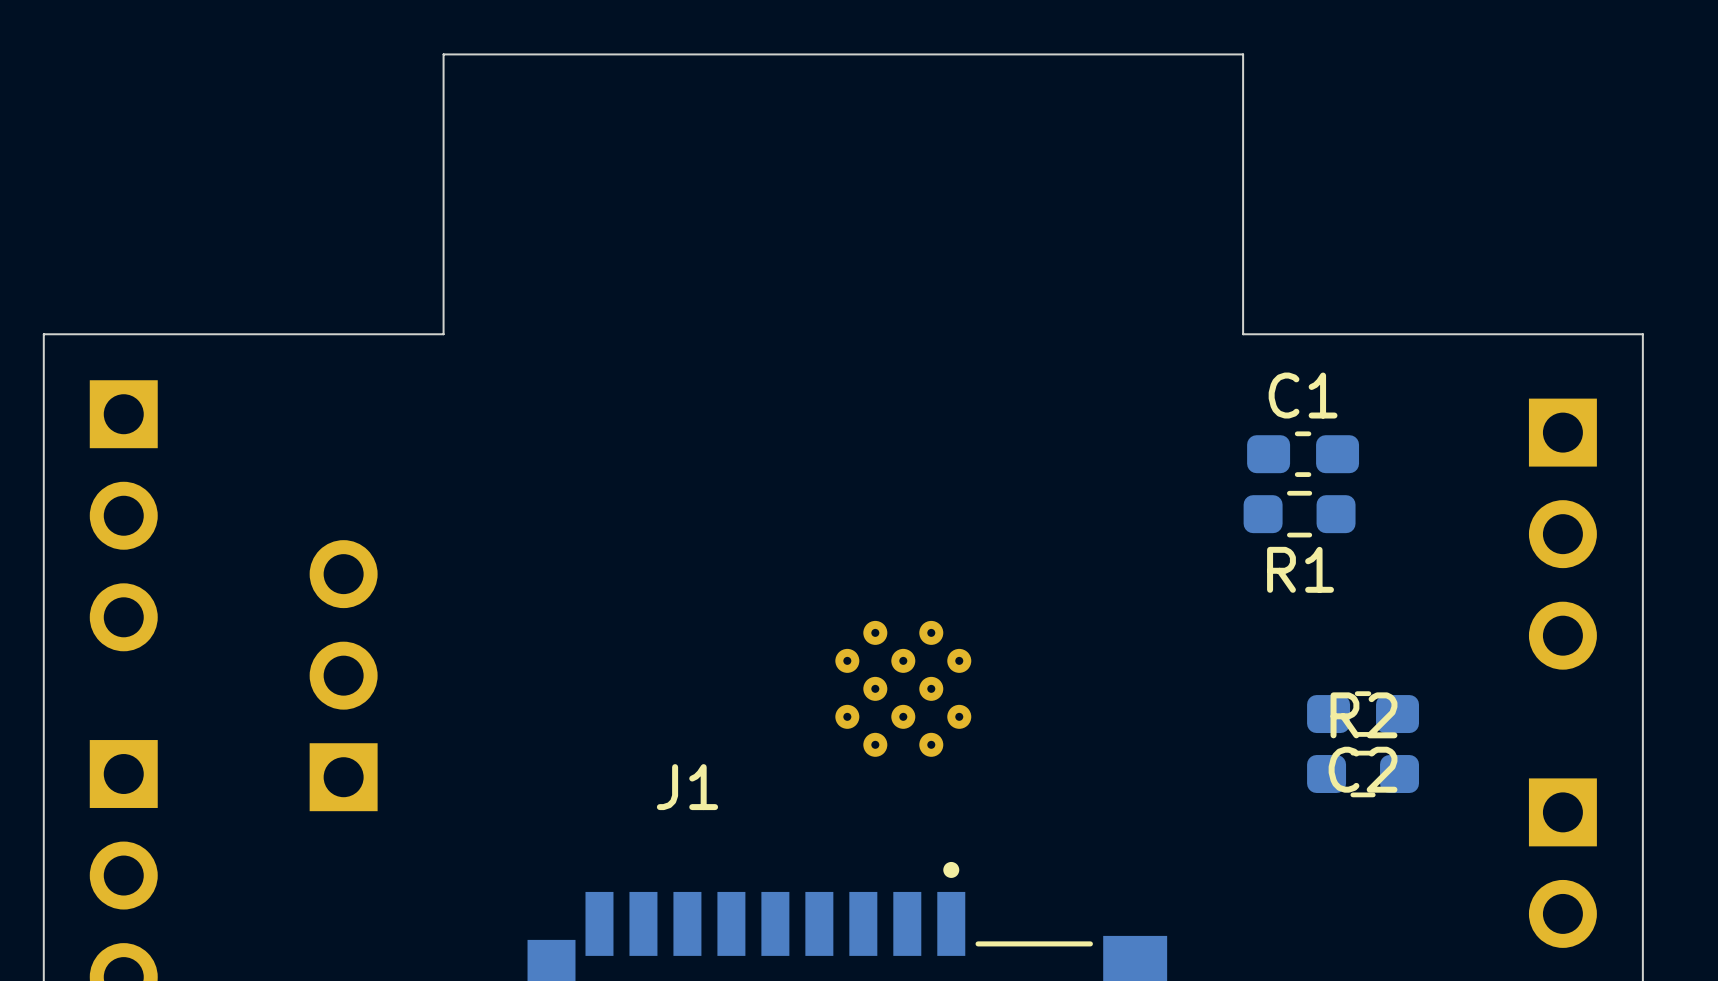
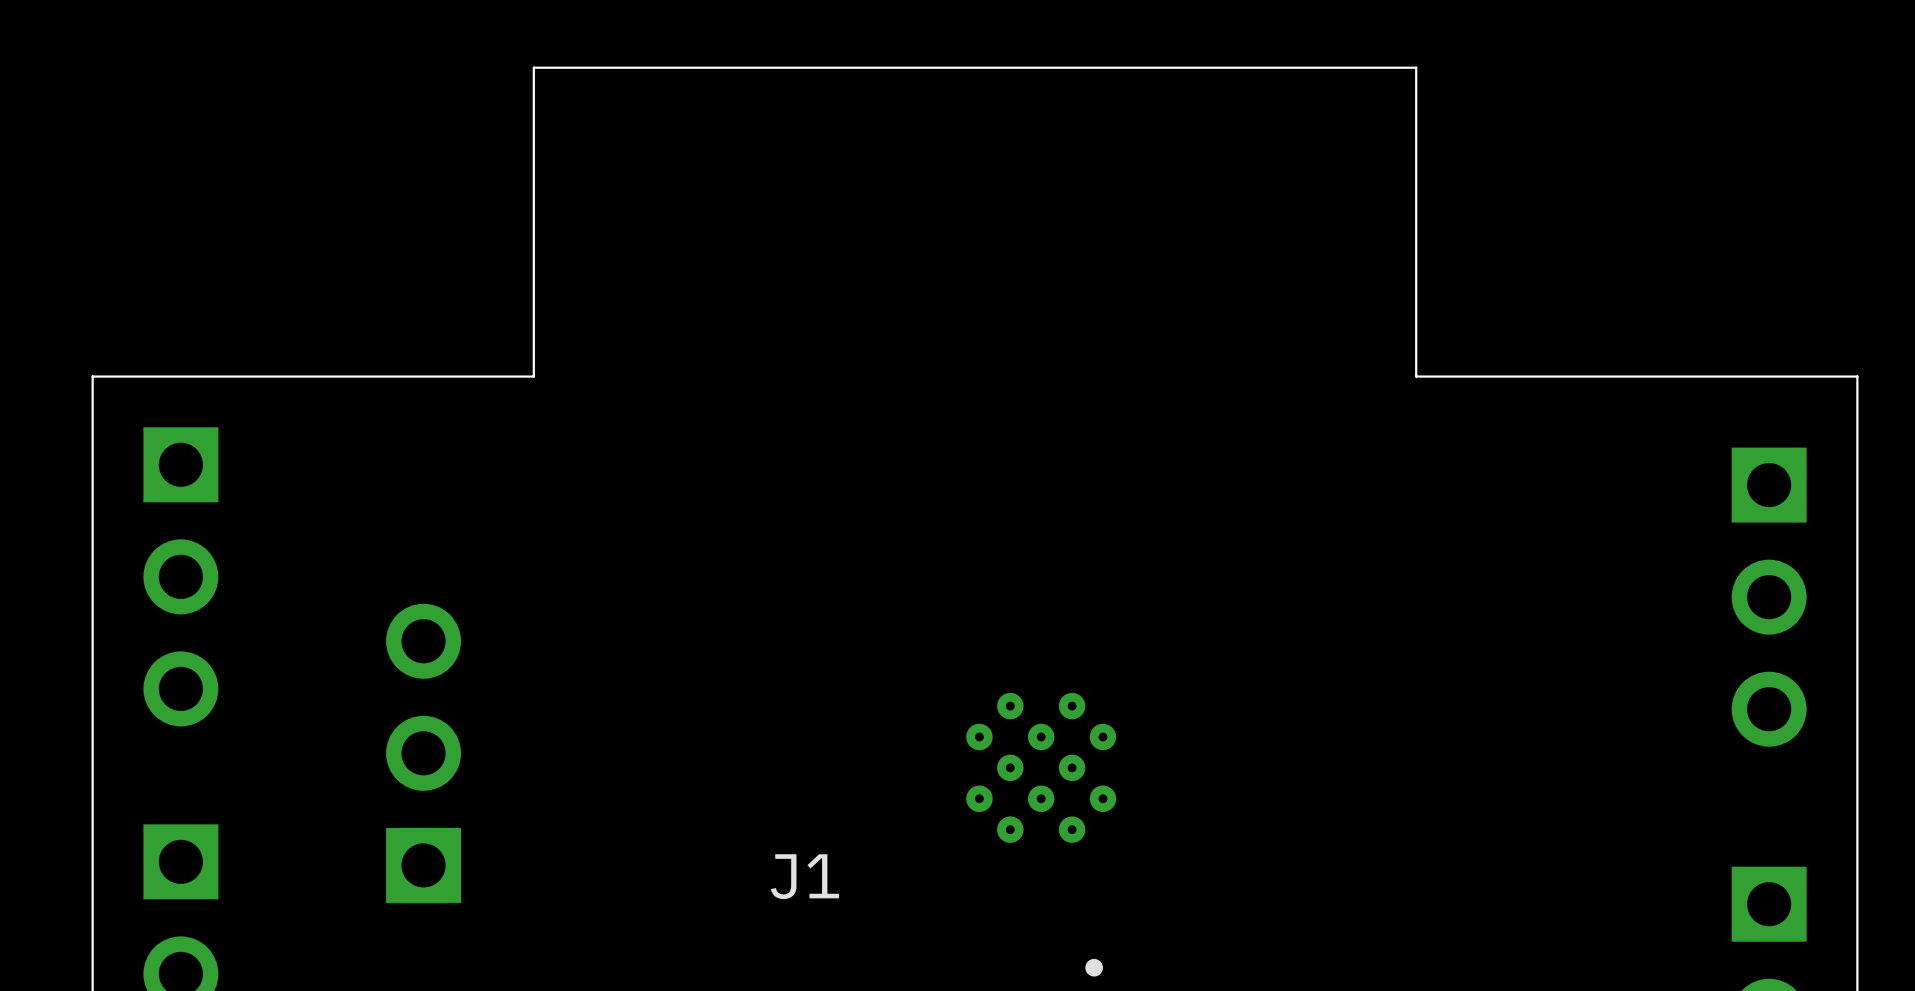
C1: (1303, 454) -> none
R1: (1299, 514) -> none
C2: (1363, 714) -> none
R2: (1363, 774) -> none

